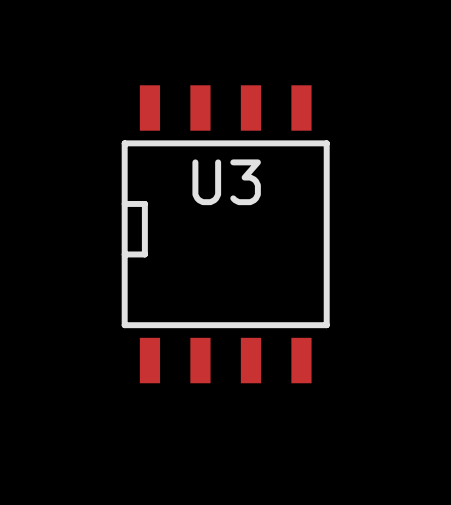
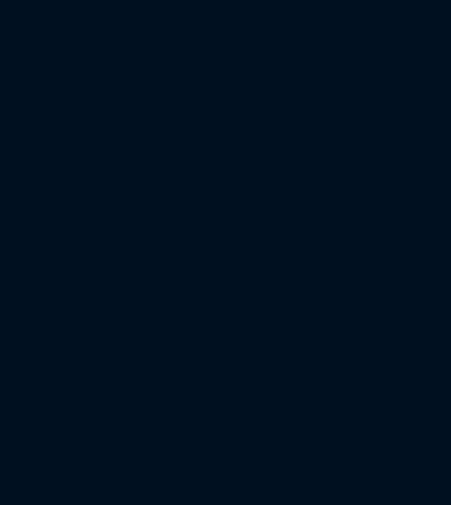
U3: (225, 234) -> none

